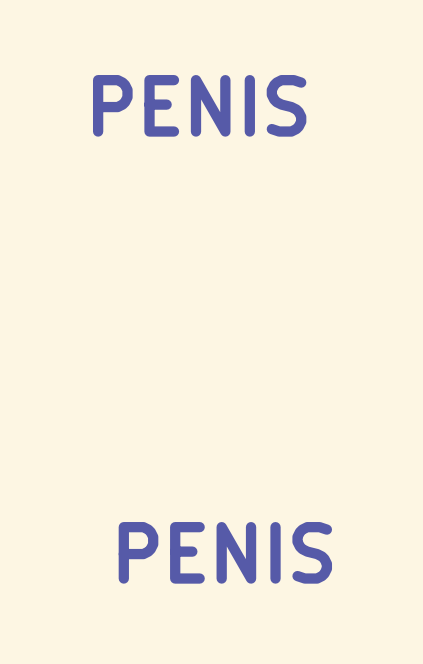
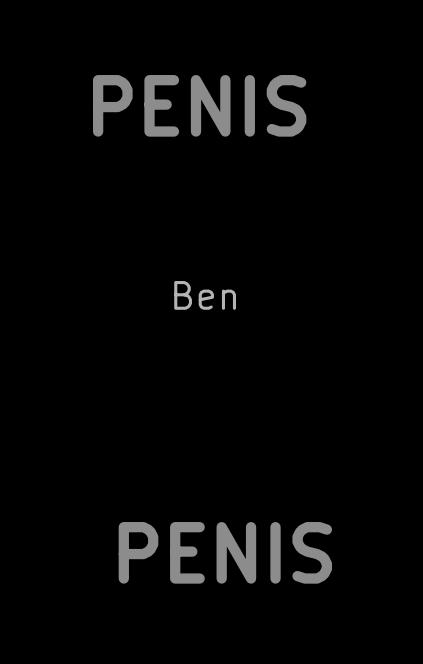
label: none -> Ben (205, 295)

